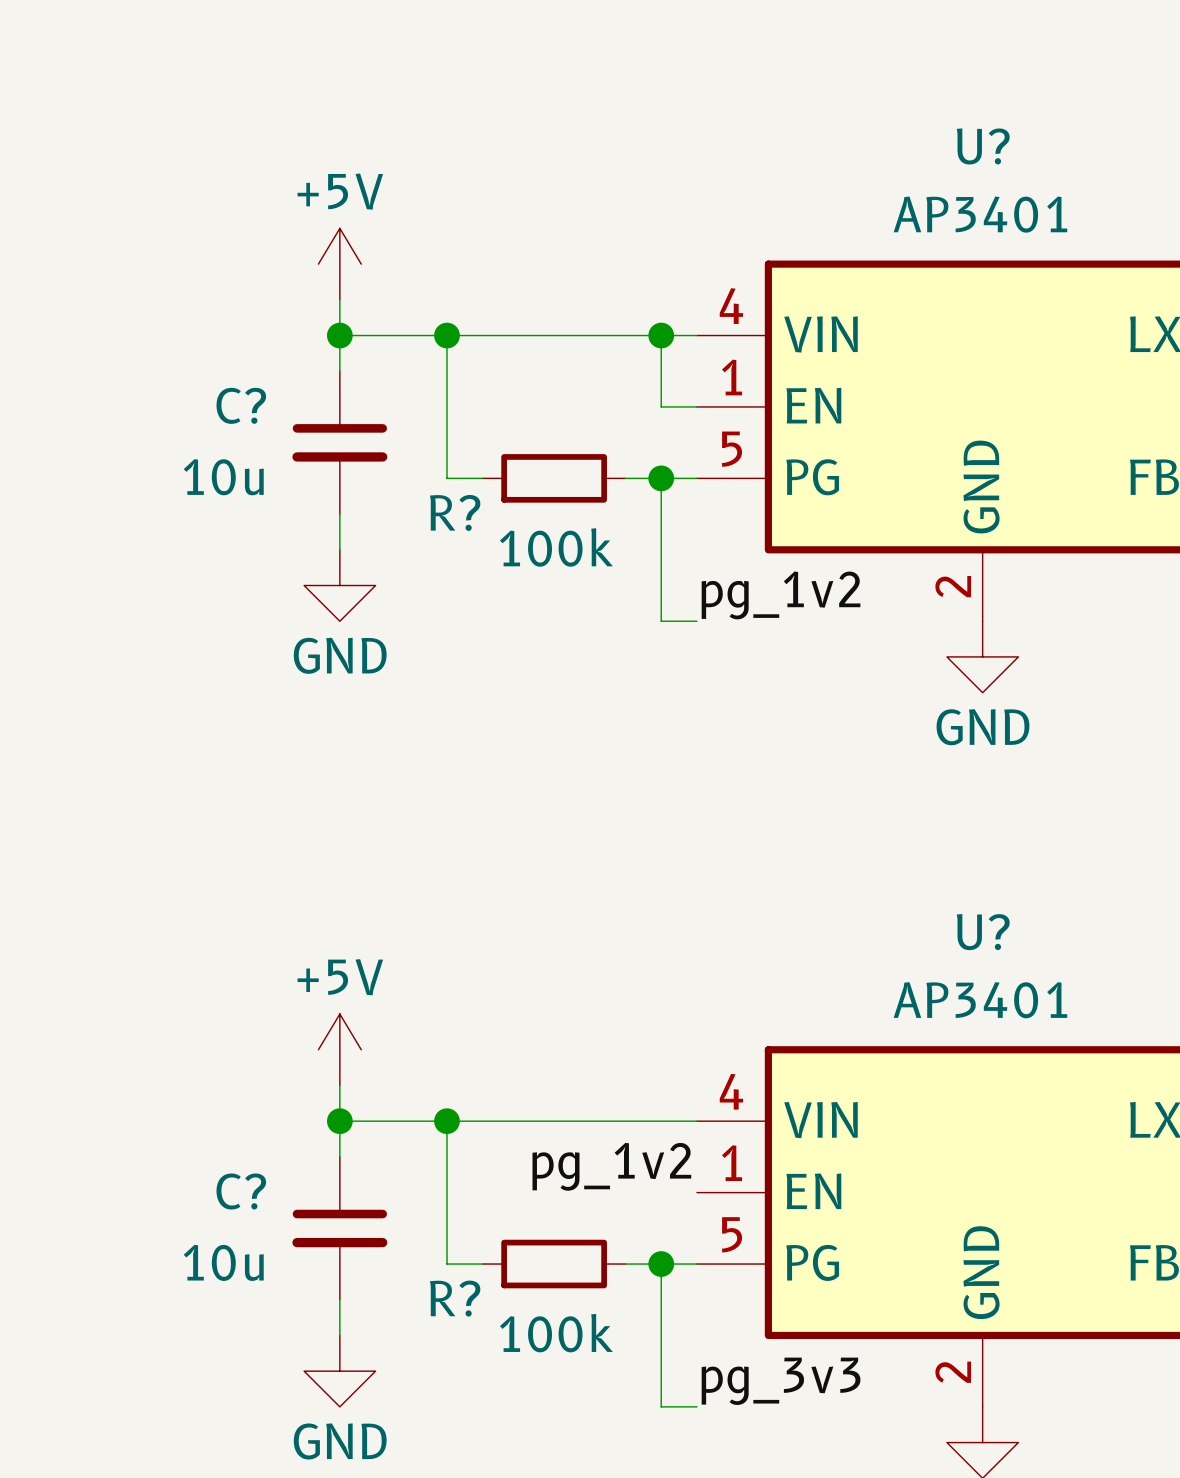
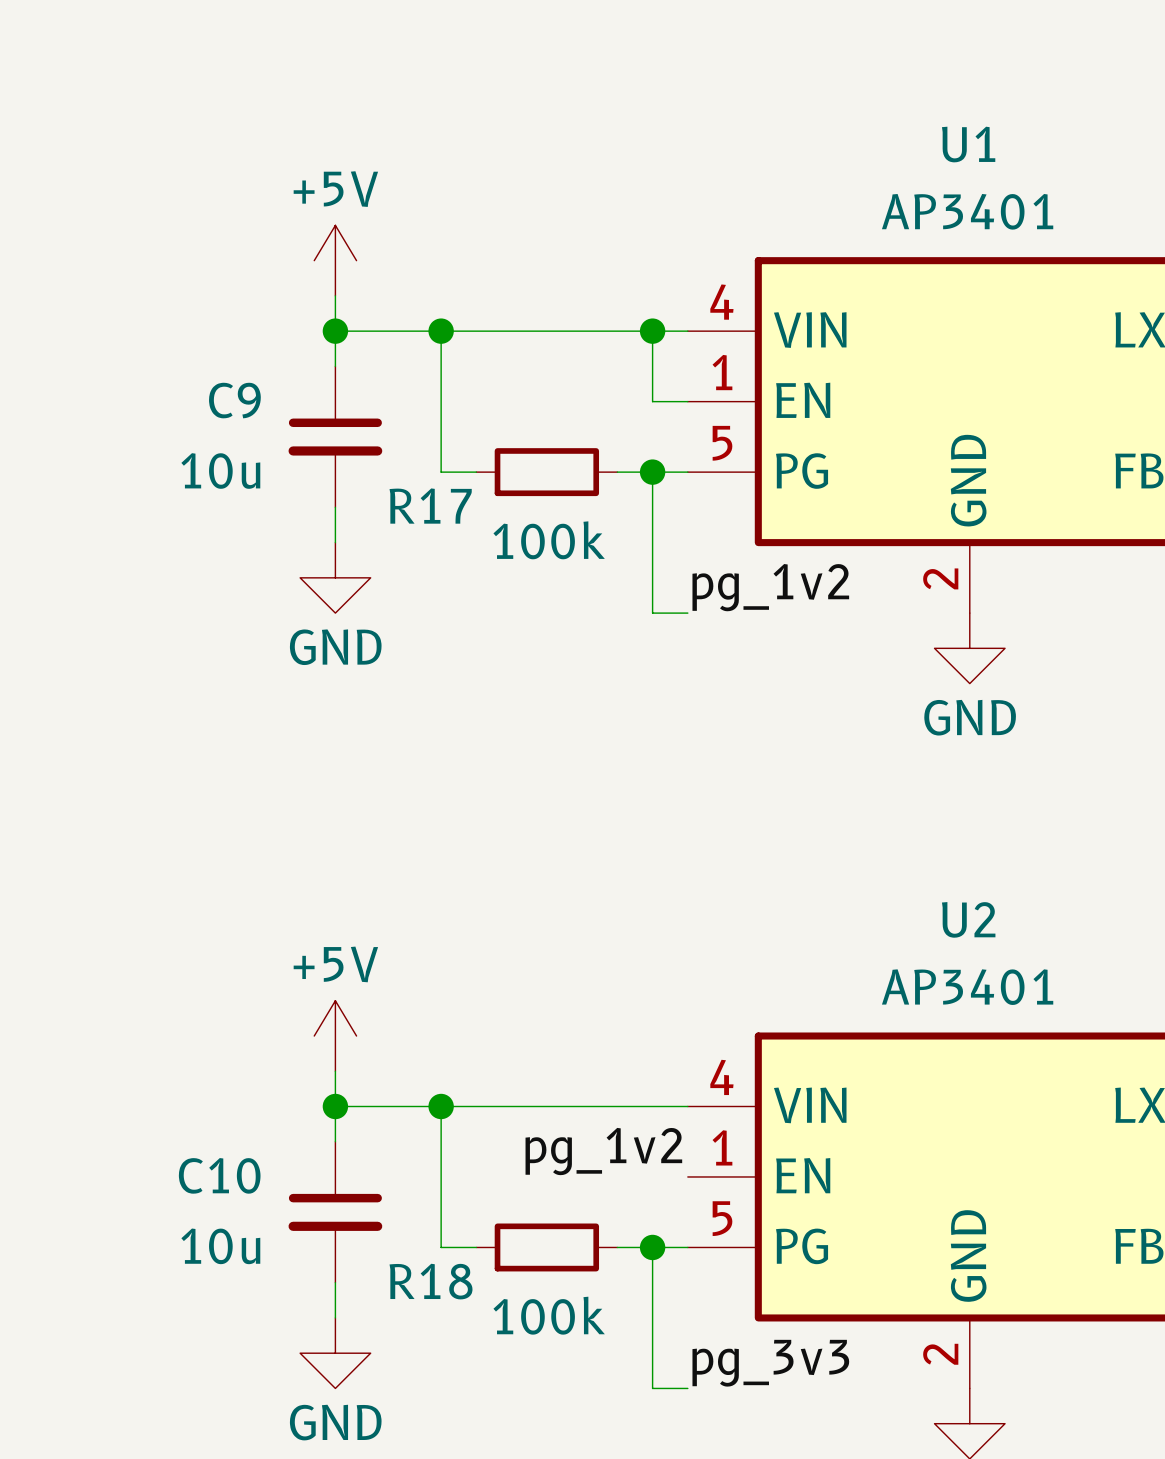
U? name: U? (983, 146) -> U1 (968, 144)
C? name: C? (241, 405) -> C9 (234, 400)
R? name: R? (455, 512) -> R17 (430, 506)
U? name: U? (983, 932) -> U2 (968, 919)
C? name: C? (241, 1191) -> C10 (219, 1175)
R? name: R? (455, 1298) -> R18 (431, 1281)

